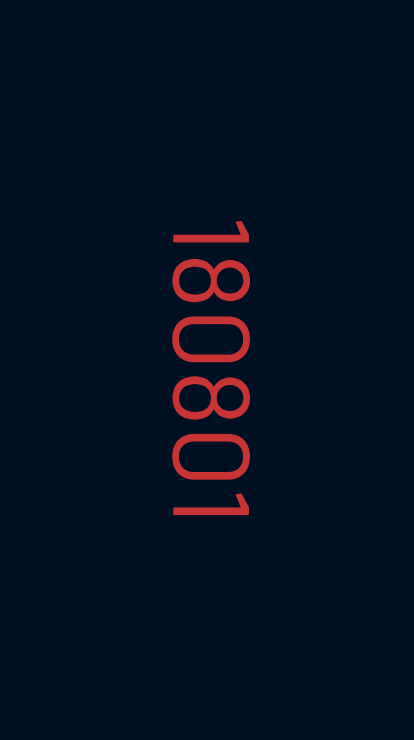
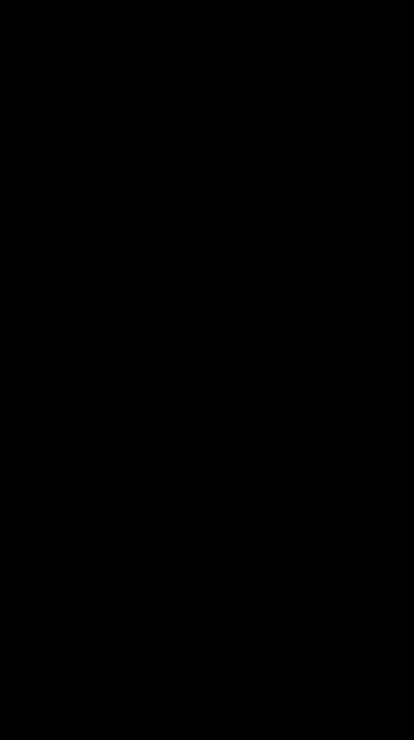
text: 180801 (211, 368) -> none

